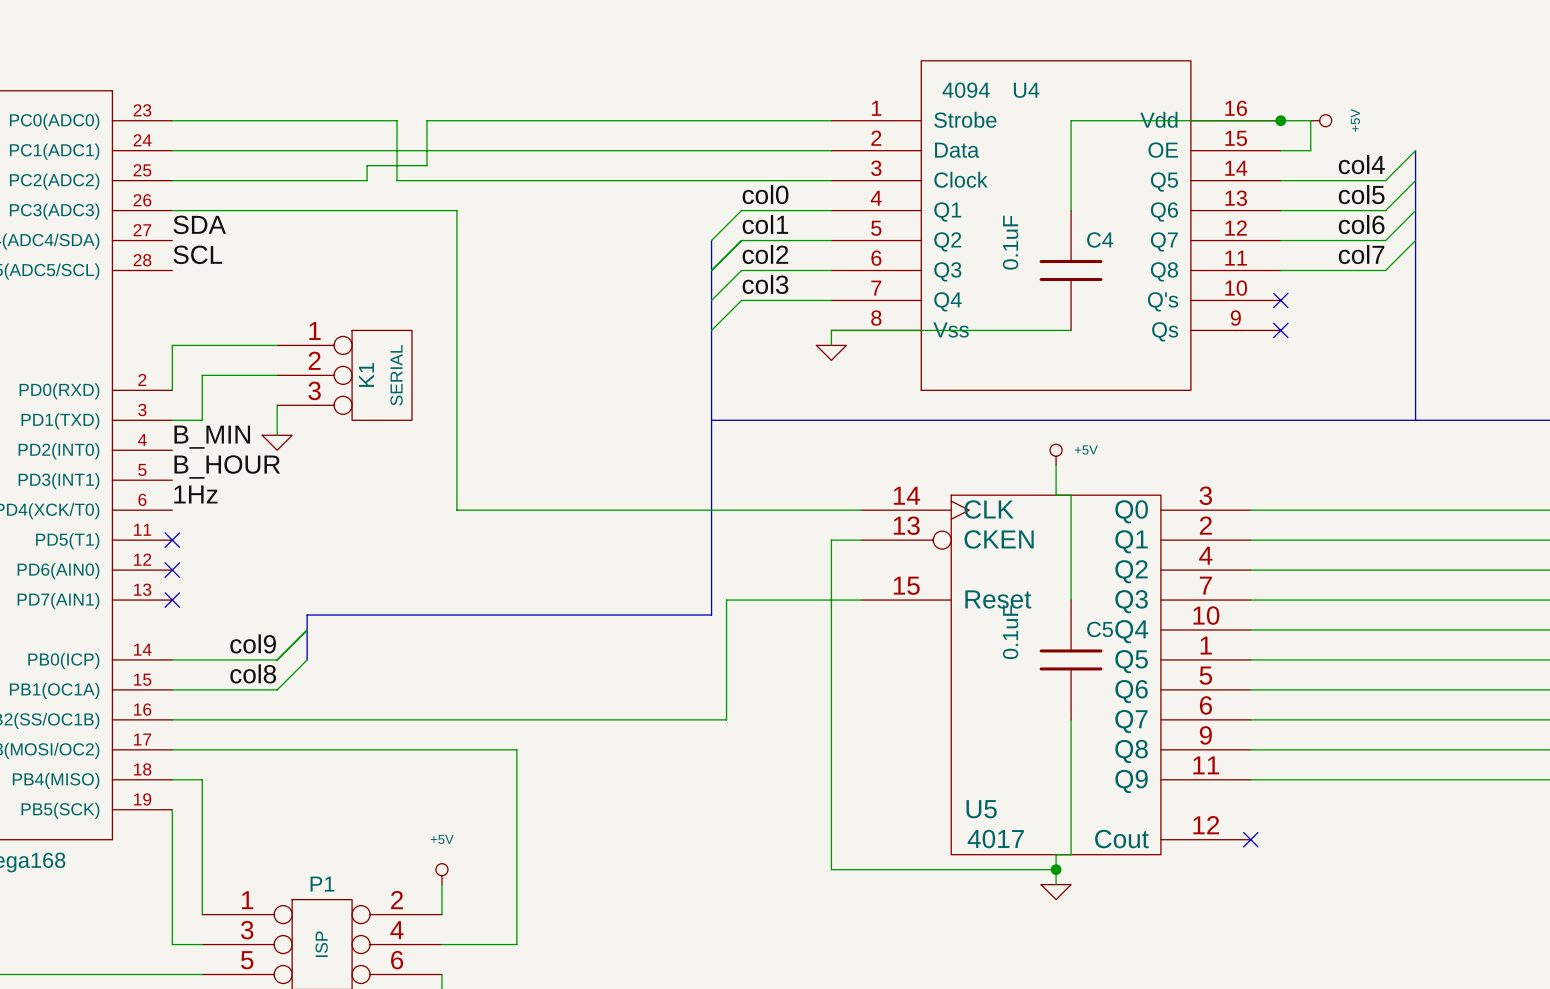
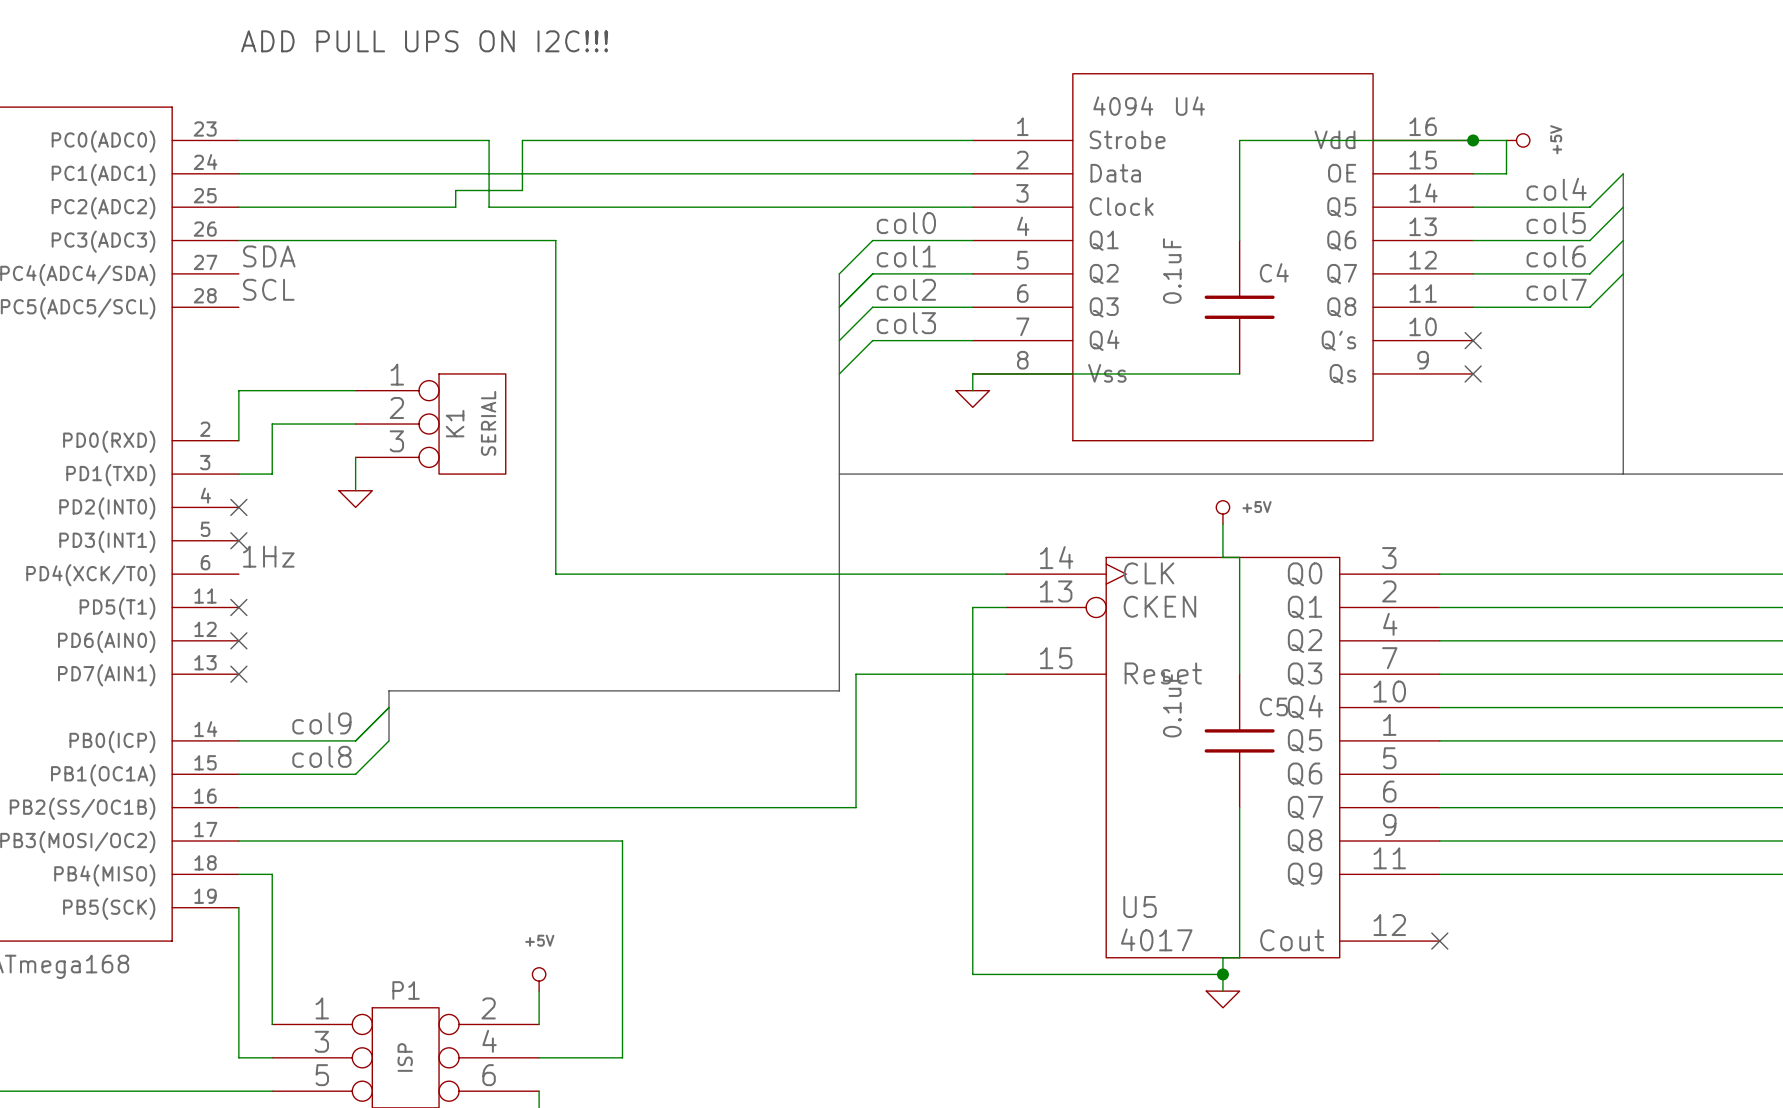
text: none -> ADD PULL UPS ON I2C!!! (424, 41)
label: B_MIN (212, 437) -> none
no-connect mark: none -> (238, 507)
label: B_HOUR (227, 466) -> none
no-connect mark: none -> (238, 540)

